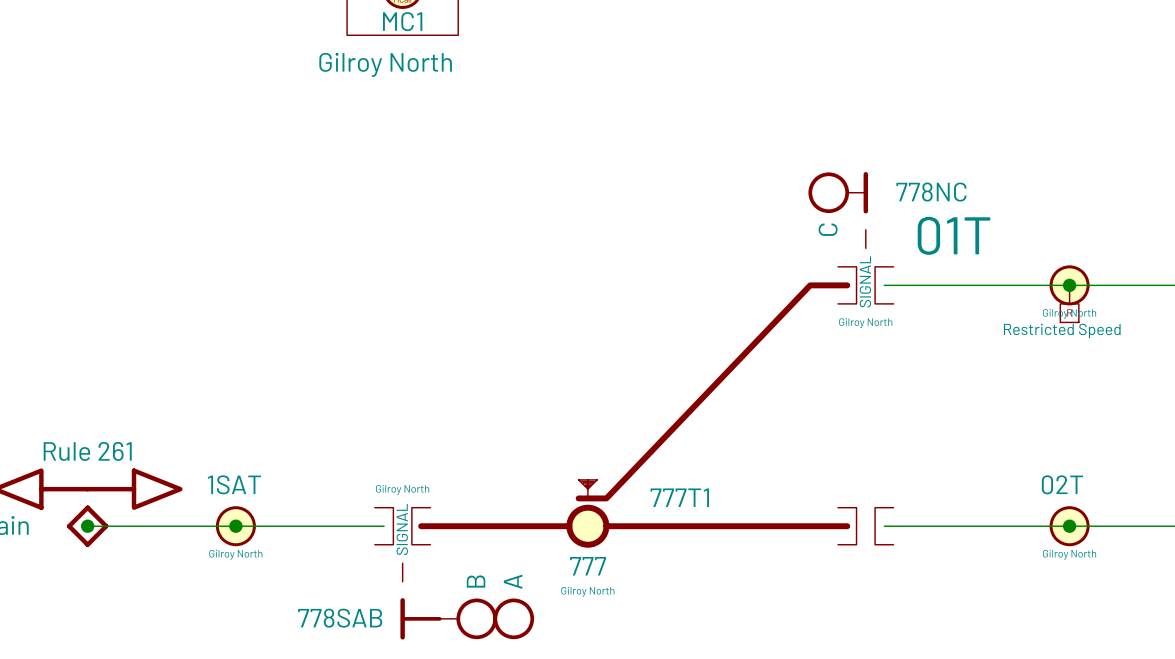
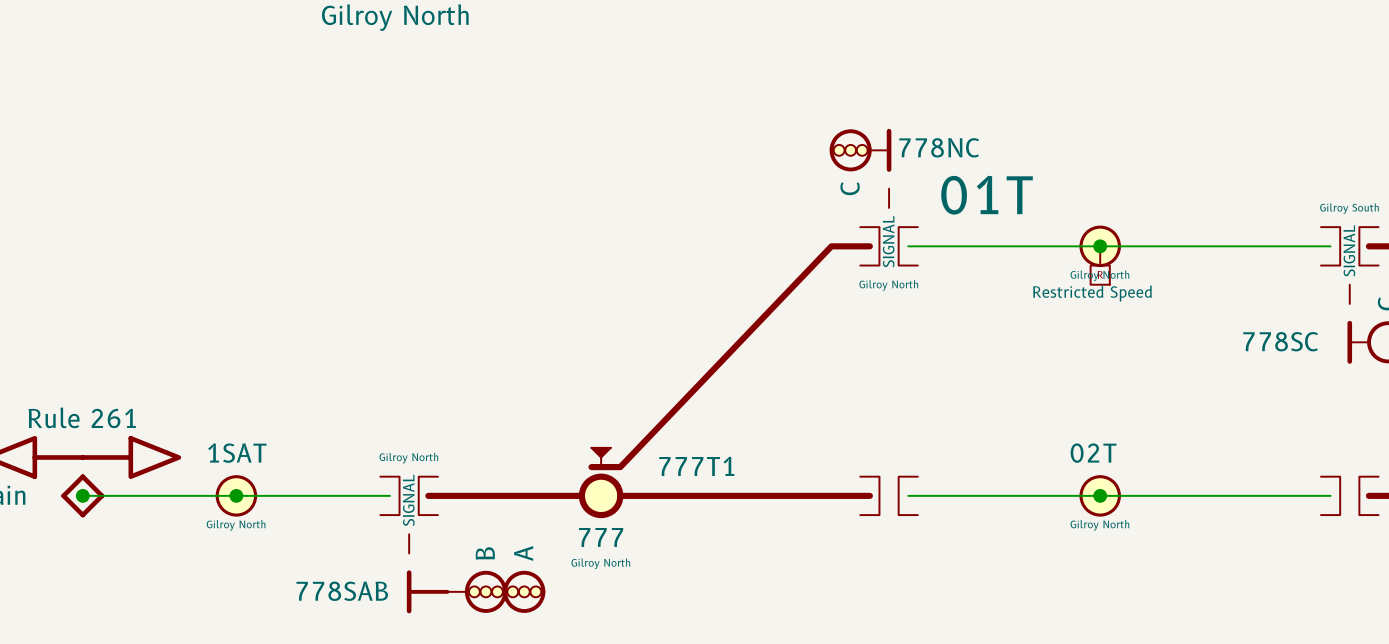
part symbol: [808, 172, 850, 214] -> [829, 129, 872, 172]
part value position: 778NC (931, 192) -> 778NC (939, 147)
part symbol: [456, 598, 498, 640] -> [464, 570, 507, 613]
part symbol: [493, 598, 535, 640] -> [503, 570, 546, 613]

